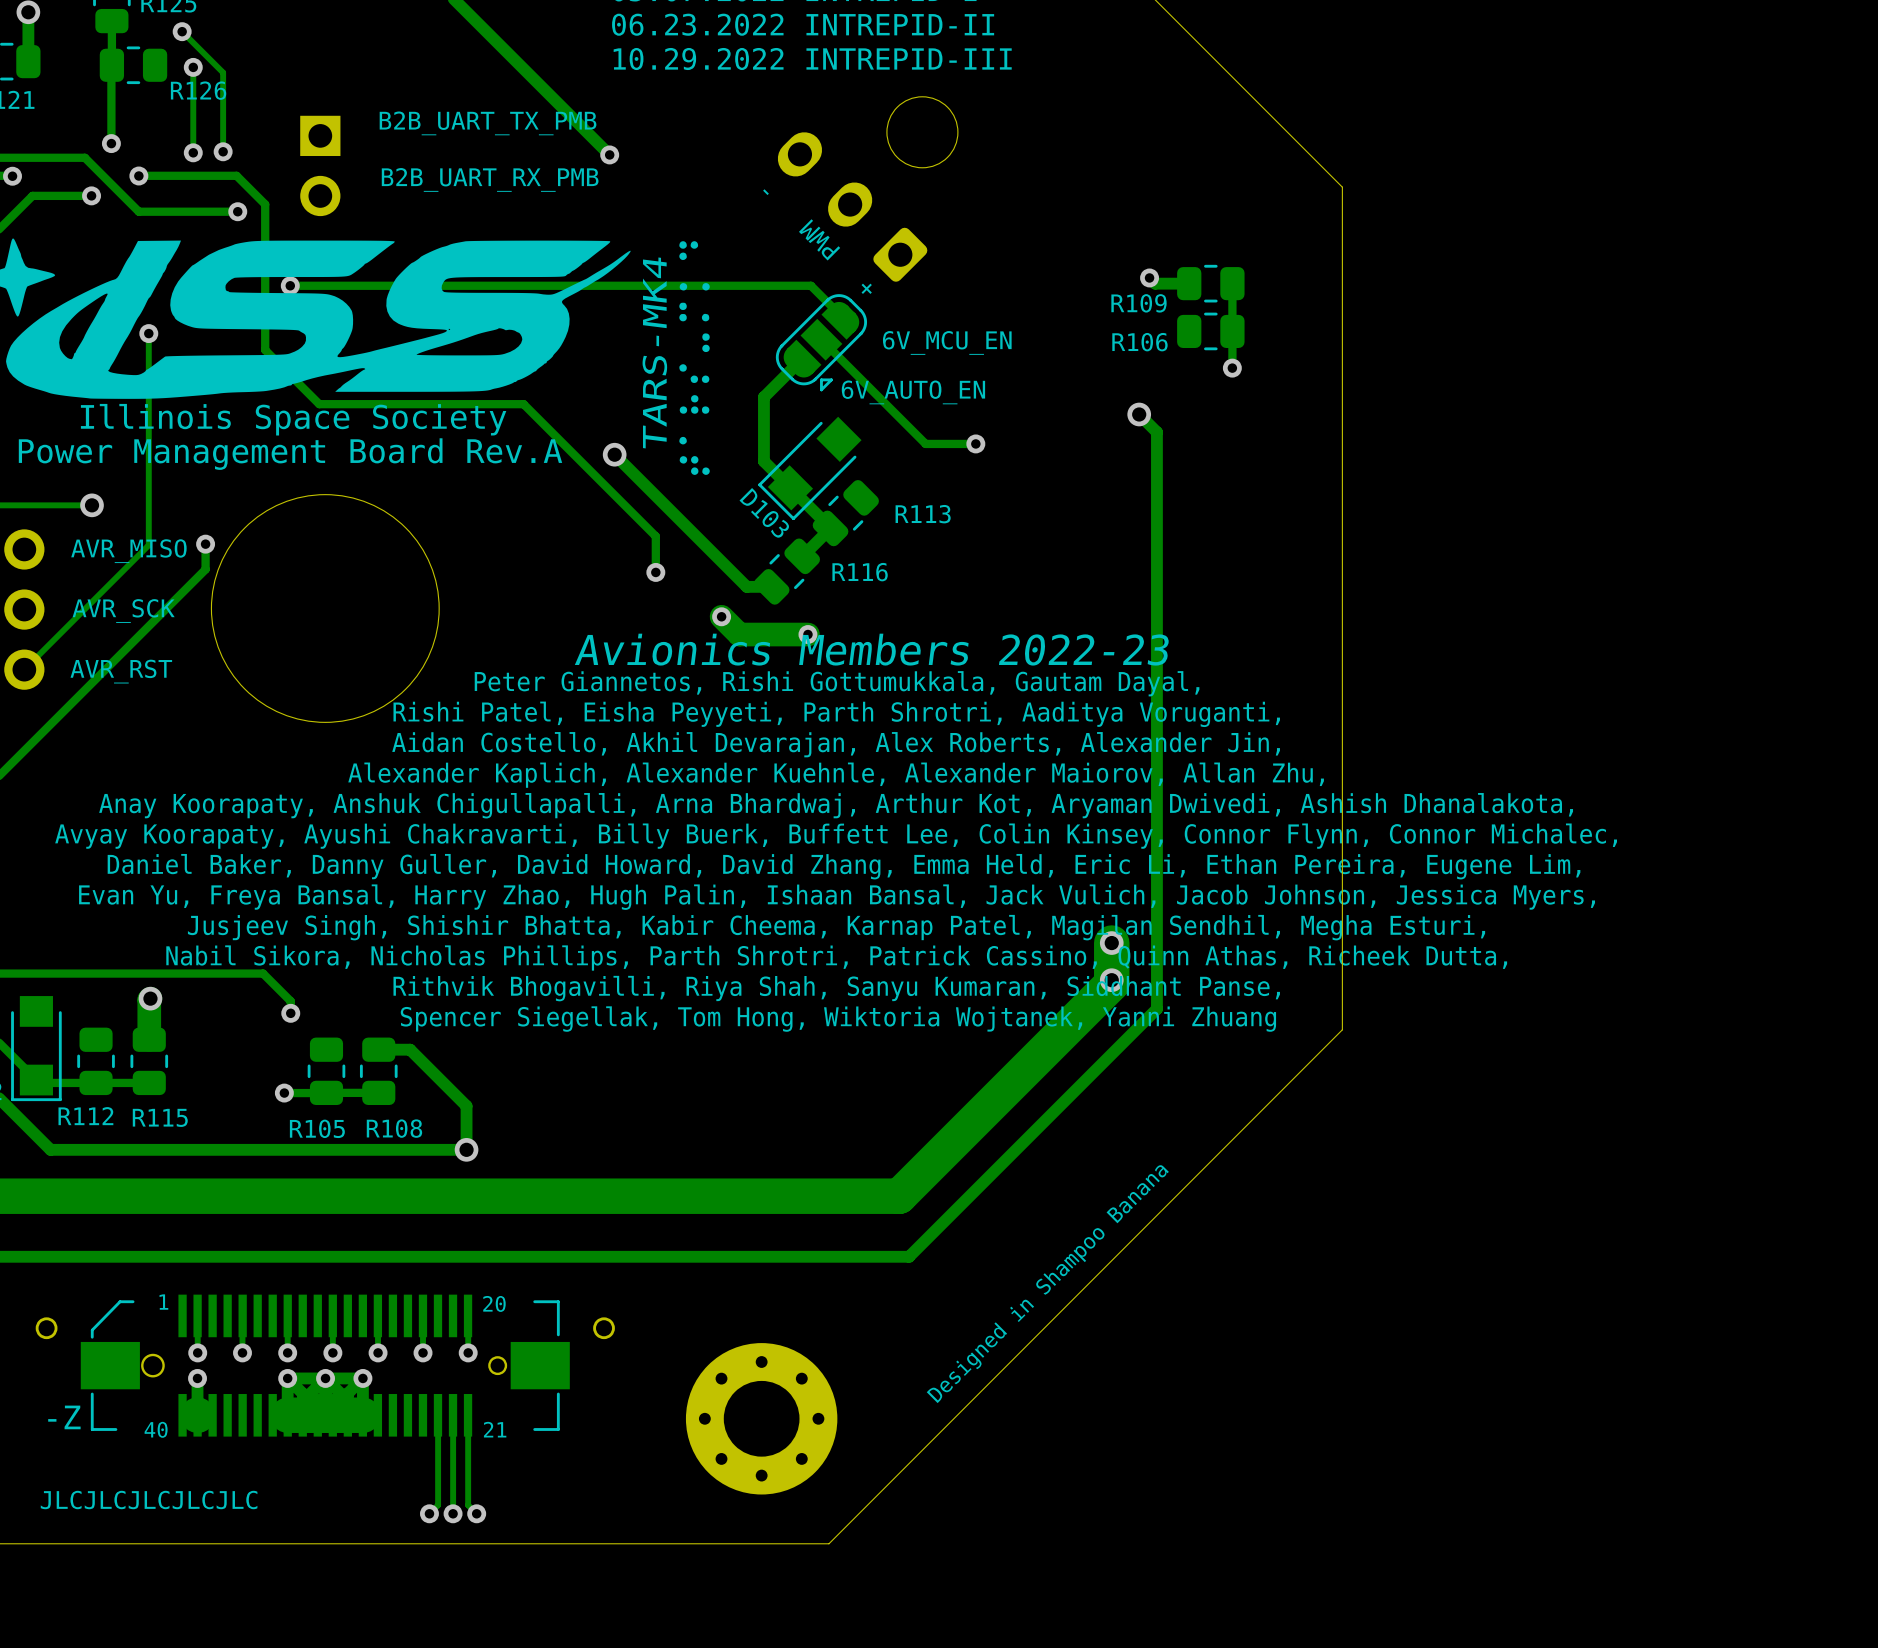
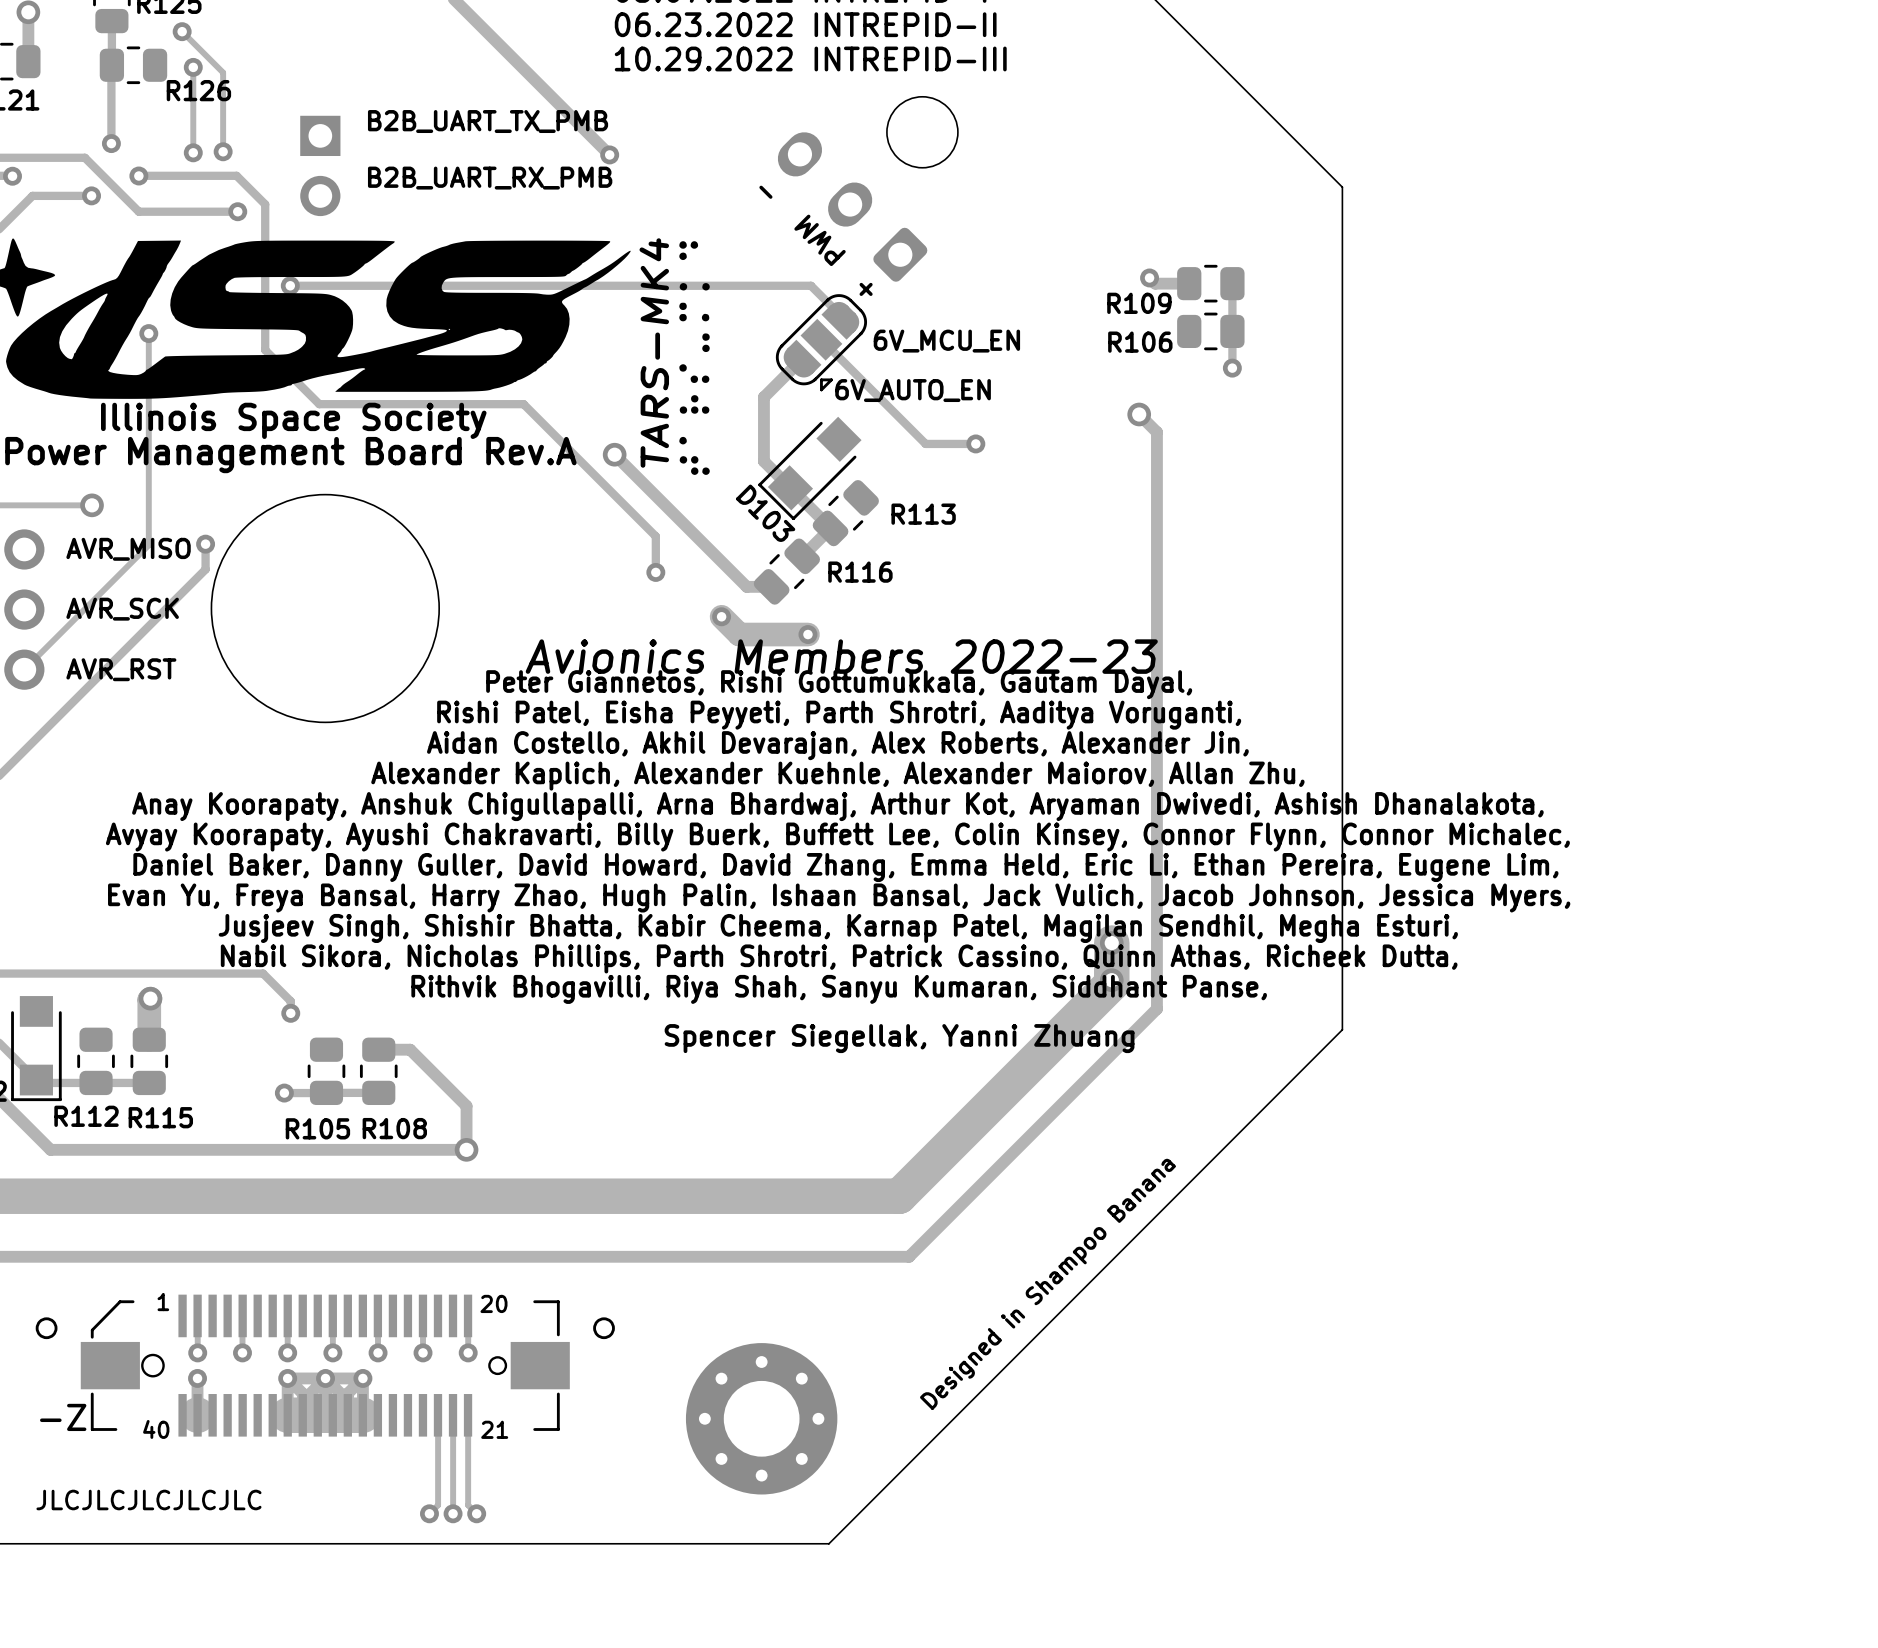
text position: Avionics Members 2022-23 (871, 649) -> Avionics Members 2022-23 (841, 656)
text: Spencer Siegellak, Tom Hong, Wiktoria Wojtanek, Yanni Zhuang (838, 1019) -> Spencer Siegellak, Yanni Zhuang (899, 1038)

